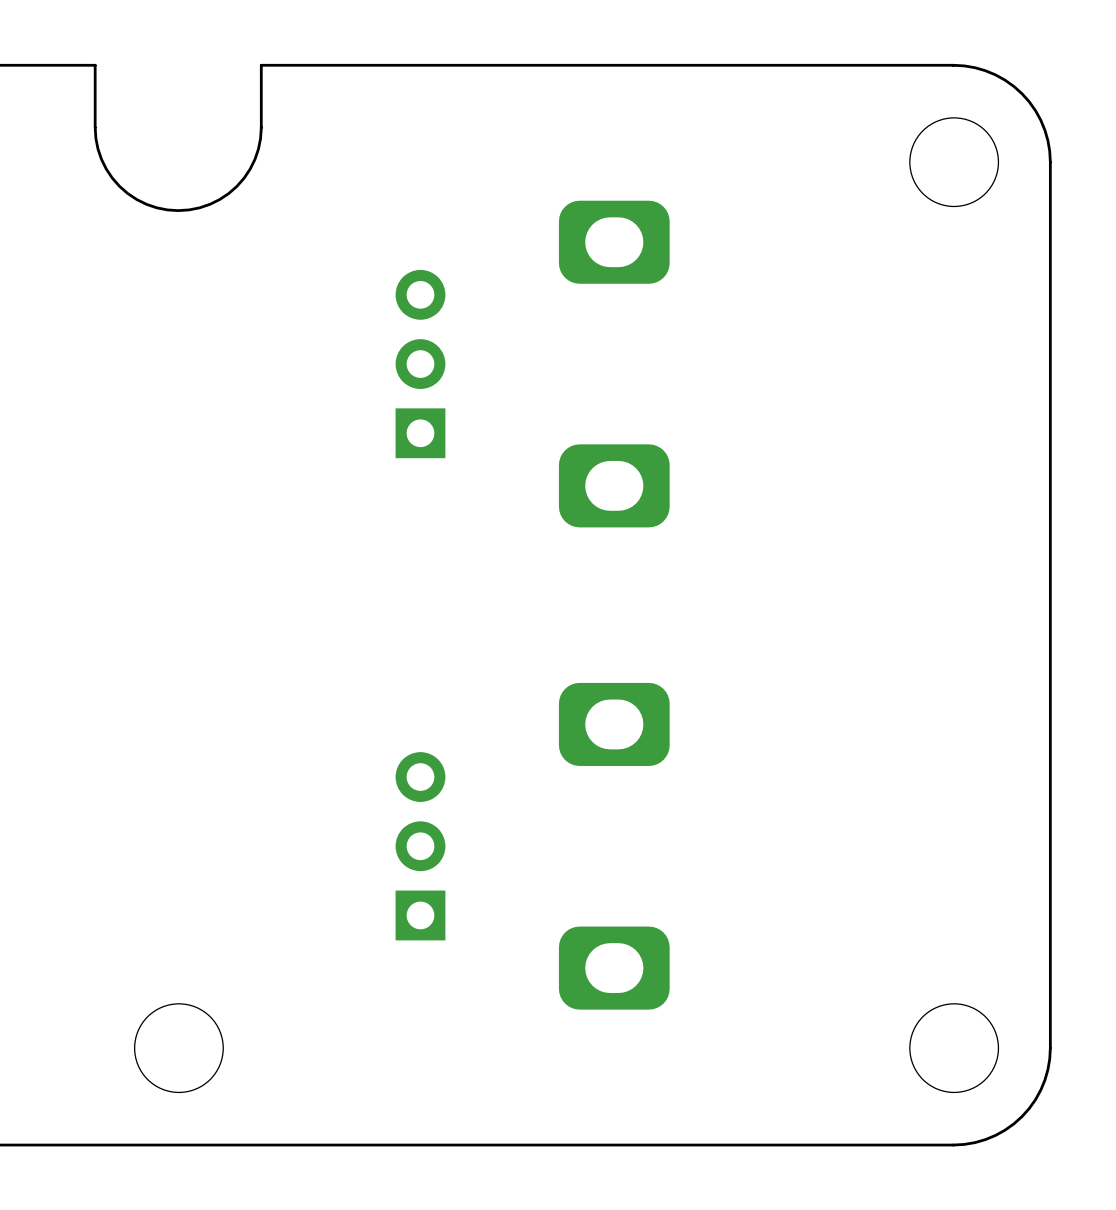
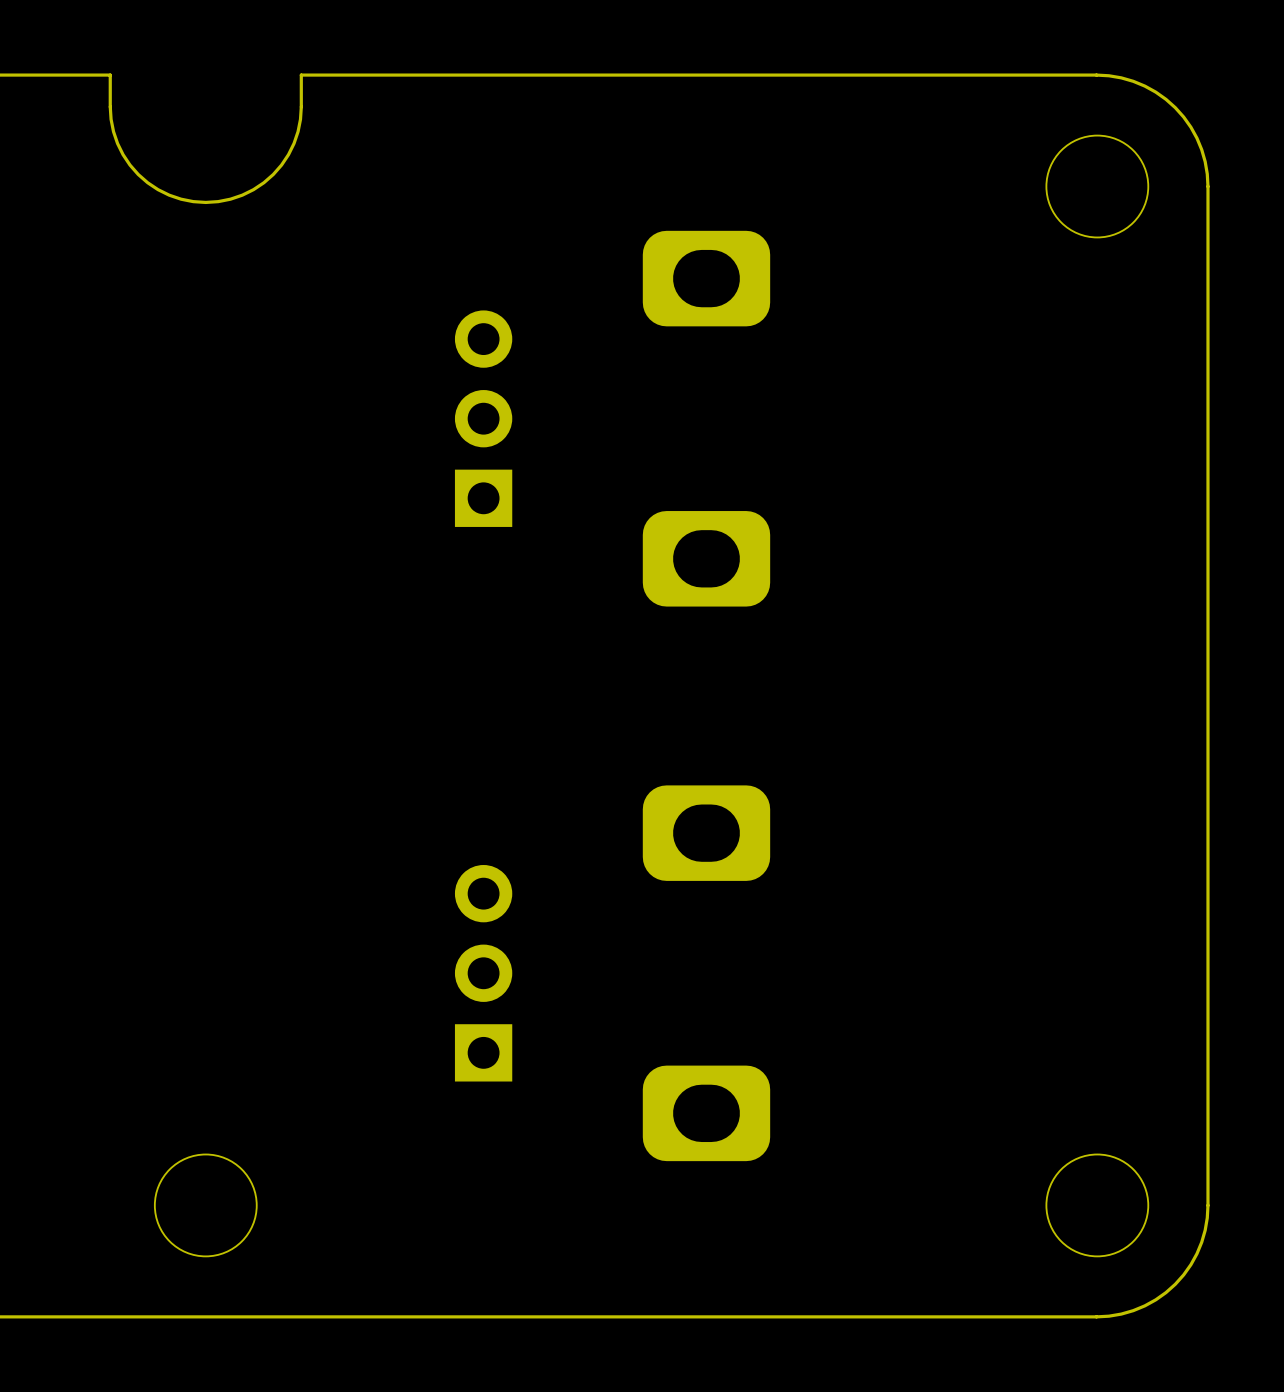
board edge: (261, 65) (260, 138) (250, 169) (236, 186) (219, 199) (199, 207) (178, 210) (156, 207) (136, 199) (119, 186) (106, 169) (95, 138) (95, 65) -> (301, 75) (301, 106) (298, 131) (294, 143) (281, 165) (263, 182) (242, 195) (230, 199) (205, 202) (181, 199) (169, 195) (147, 182) (130, 165) (117, 143) (113, 131) (111, 119) (109, 75)

